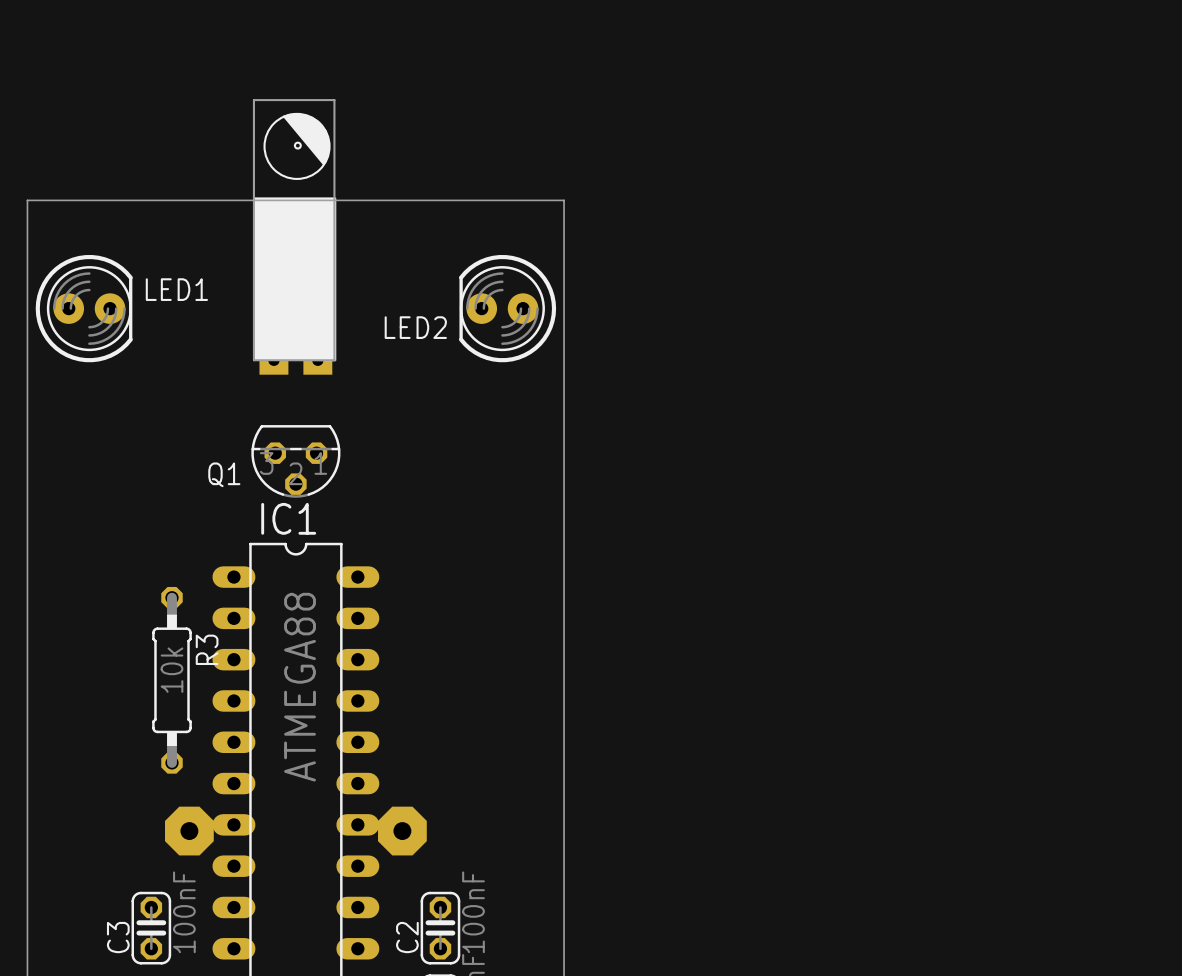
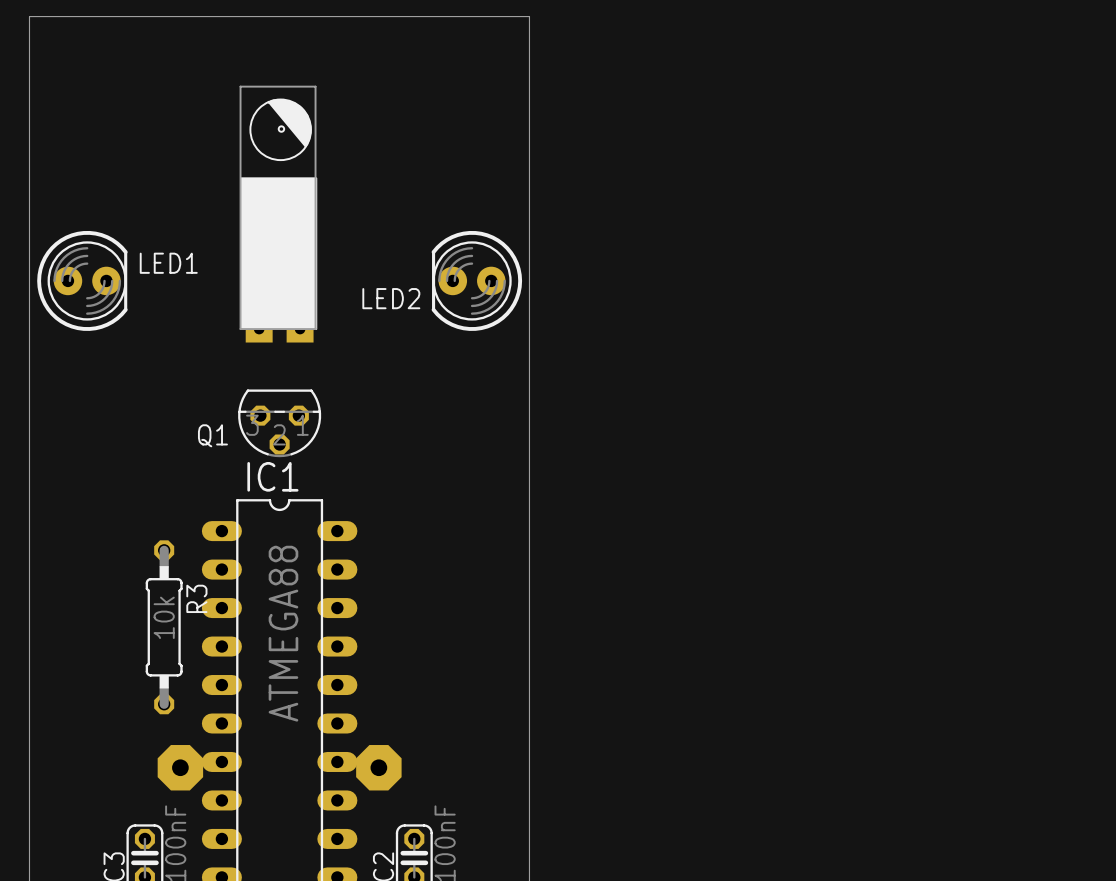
board edge: (27, 200) (564, 200) -> (29, 180) (29, 16) (529, 16) (529, 180)

